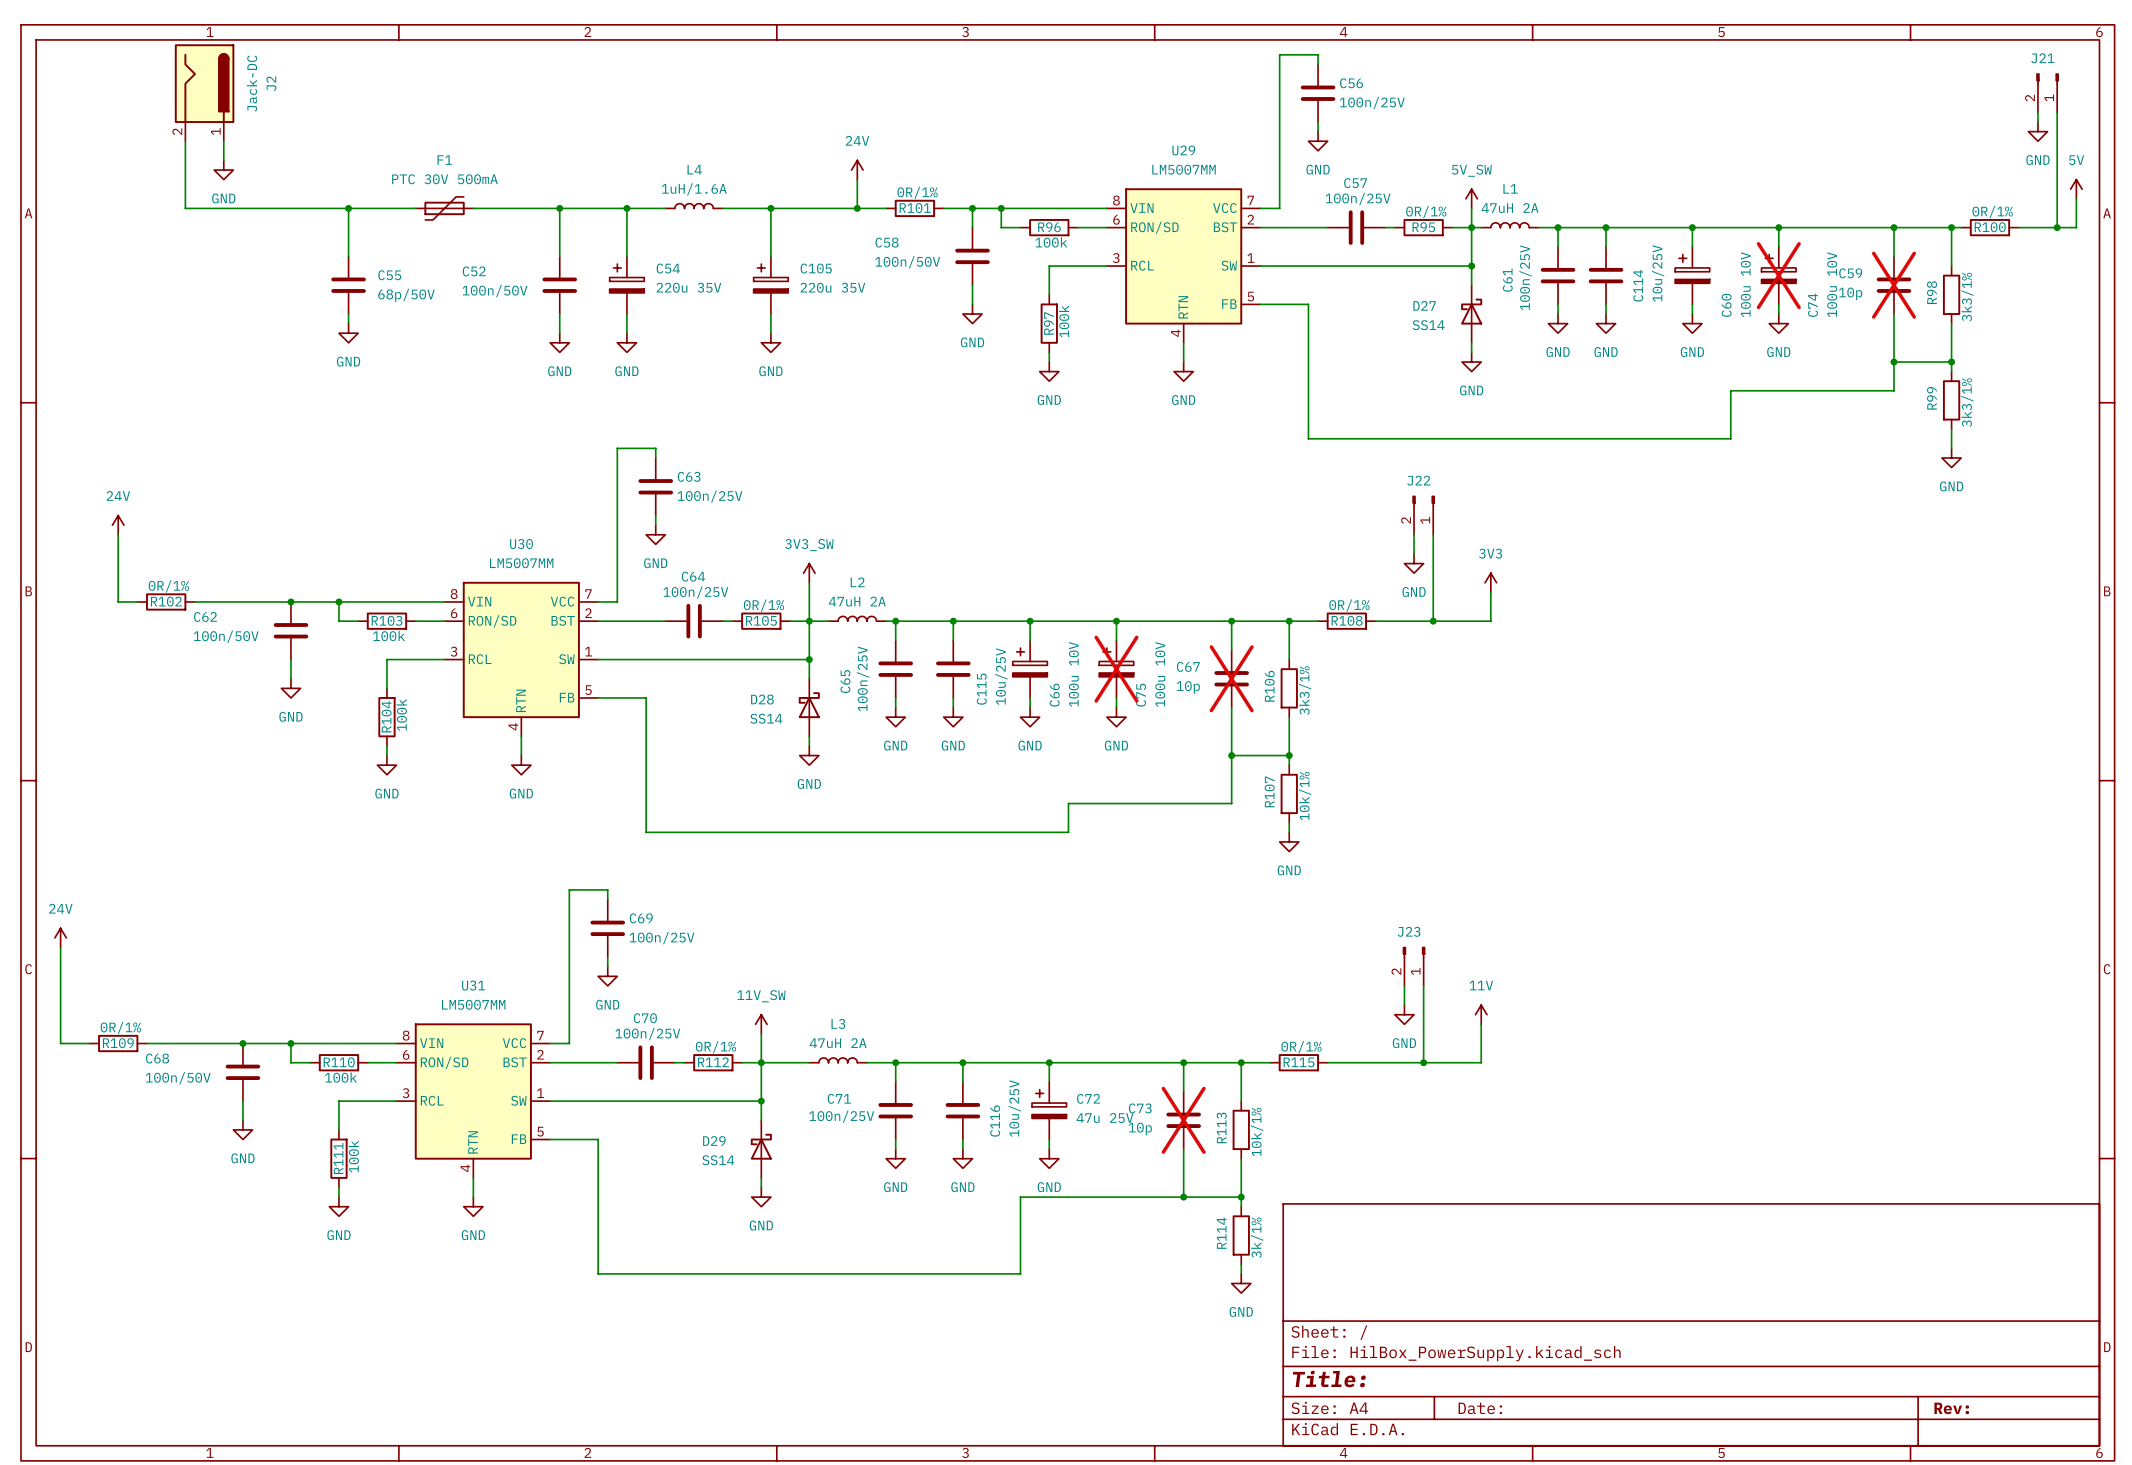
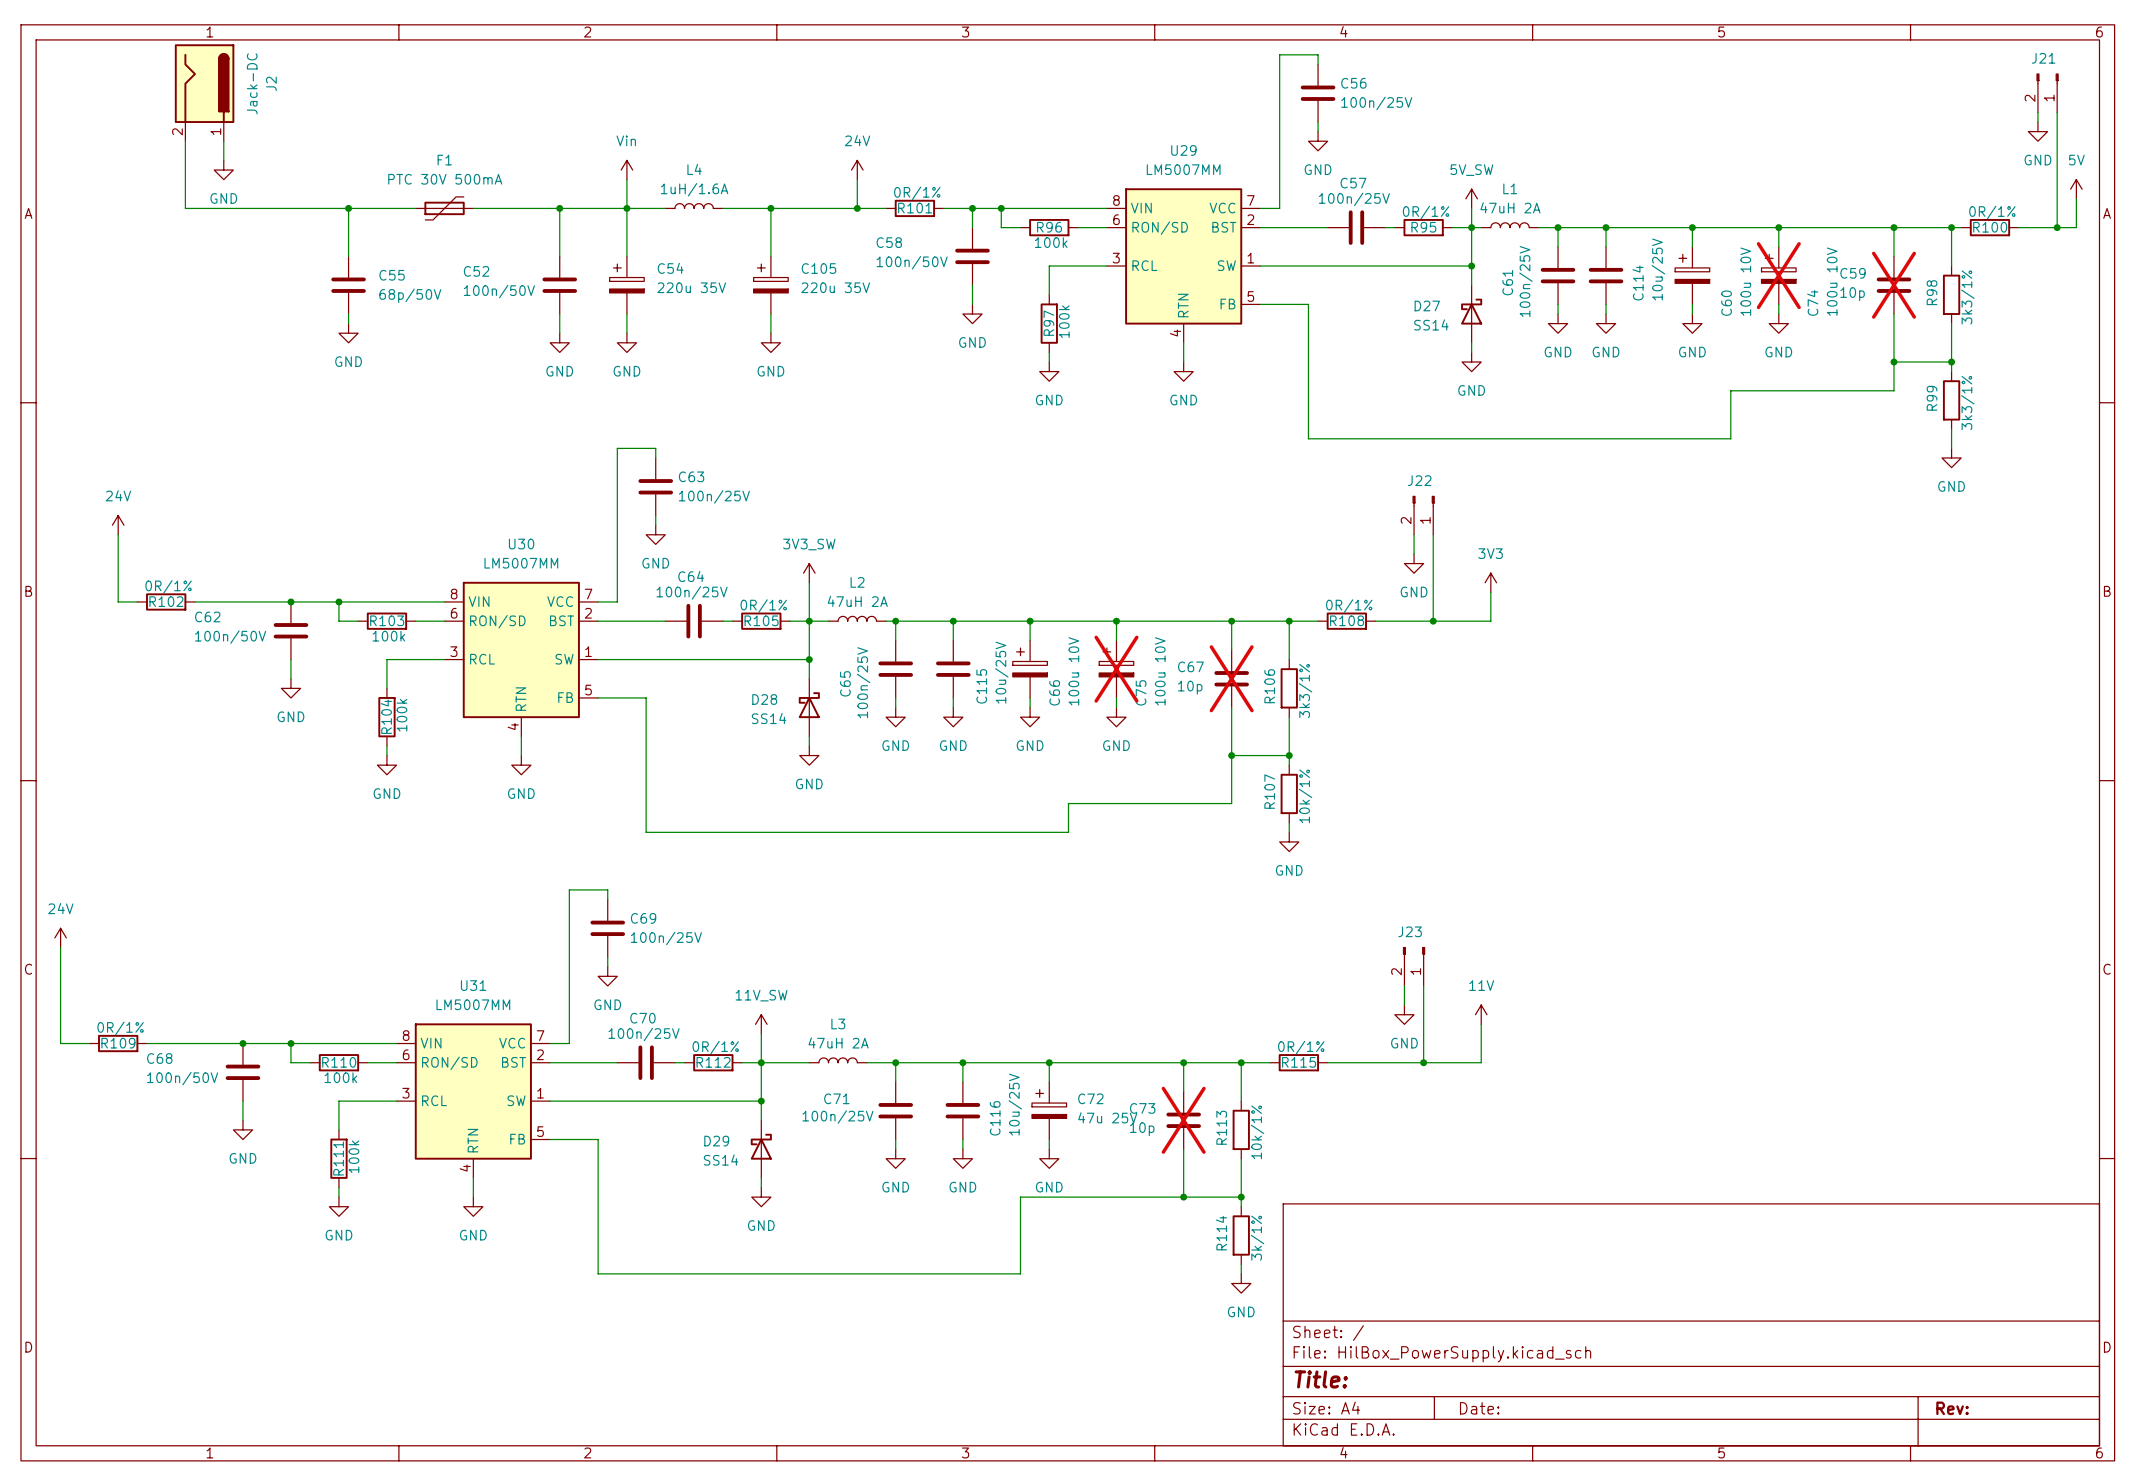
power symbol: none -> Vin (626, 170)
wire: none -> (626, 179) (626, 208)

